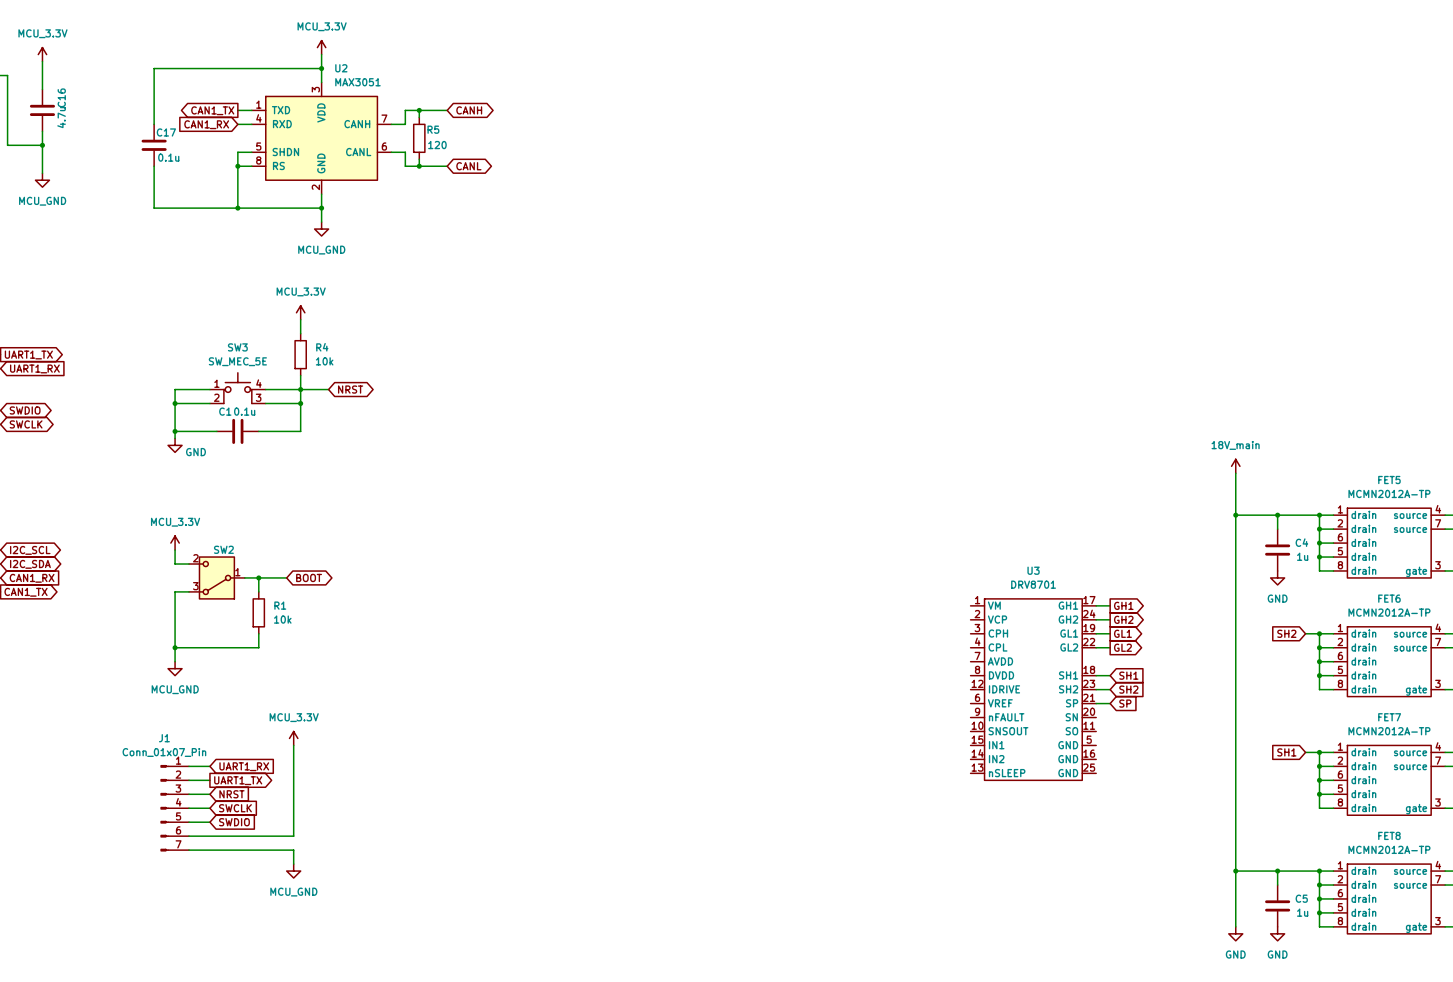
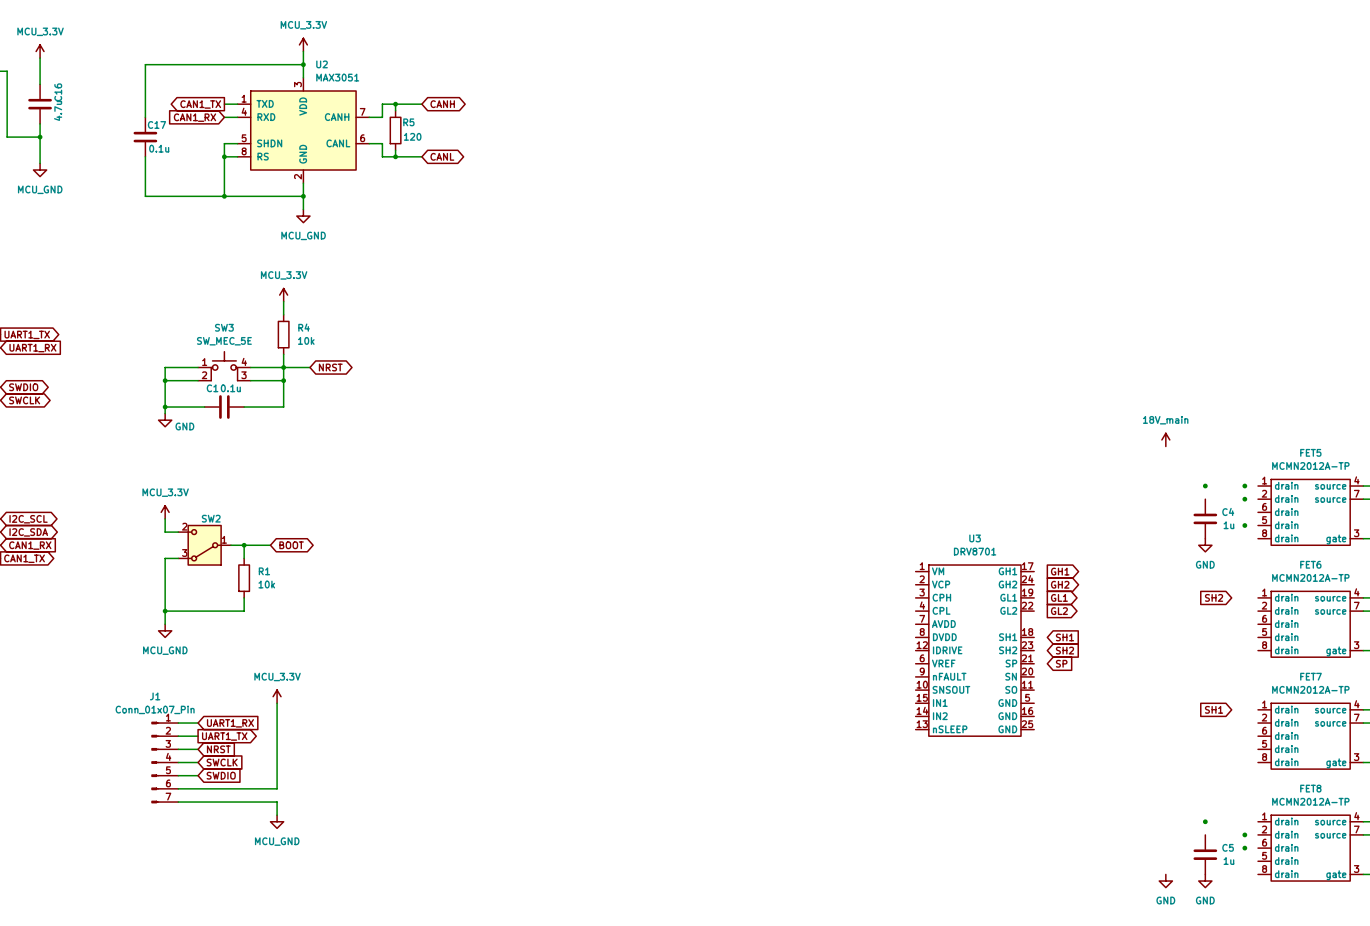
wire: (1235, 473) (1235, 926) -> none
wire: (1235, 515) (1333, 515) -> none
junction: (1235, 515) -> none
wire: (1277, 515) (1277, 529) -> none
wire: (1319, 515) (1319, 570) (1333, 570) -> none
wire: (1319, 529) (1333, 529) -> none
wire: (1319, 543) (1333, 543) -> none
junction: (1319, 543) -> none
wire: (1319, 557) (1333, 557) -> none
wire: (1096, 605) (1110, 605) -> none
wire: (1096, 619) (1110, 619) -> none
wire: (1096, 633) (1110, 633) -> none
wire: (1305, 633) (1333, 633) -> none
wire: (1319, 633) (1319, 689) (1333, 689) -> none
junction: (1319, 633) -> none
wire: (1096, 647) (1110, 647) -> none
wire: (1319, 647) (1333, 647) -> none
junction: (1319, 647) -> none
wire: (1319, 661) (1333, 661) -> none
junction: (1319, 661) -> none
wire: (1096, 675) (1110, 675) -> none
wire: (1319, 675) (1333, 675) -> none
junction: (1319, 675) -> none
wire: (1096, 689) (1110, 689) -> none
wire: (1096, 703) (1110, 703) -> none
wire: (1305, 752) (1333, 752) -> none
wire: (1319, 752) (1319, 808) (1333, 808) -> none
junction: (1319, 752) -> none
wire: (1319, 766) (1333, 766) -> none
junction: (1319, 766) -> none
wire: (1319, 780) (1333, 780) -> none
junction: (1319, 780) -> none
wire: (1319, 794) (1333, 794) -> none
junction: (1319, 794) -> none
wire: (1235, 871) (1333, 871) -> none
junction: (1235, 871) -> none
wire: (1277, 871) (1277, 885) -> none
wire: (1319, 871) (1319, 926) (1333, 926) -> none
junction: (1319, 871) -> none
wire: (1319, 885) (1333, 885) -> none
wire: (1319, 898) (1333, 898) -> none
wire: (1319, 912) (1333, 912) -> none
junction: (1319, 912) -> none

